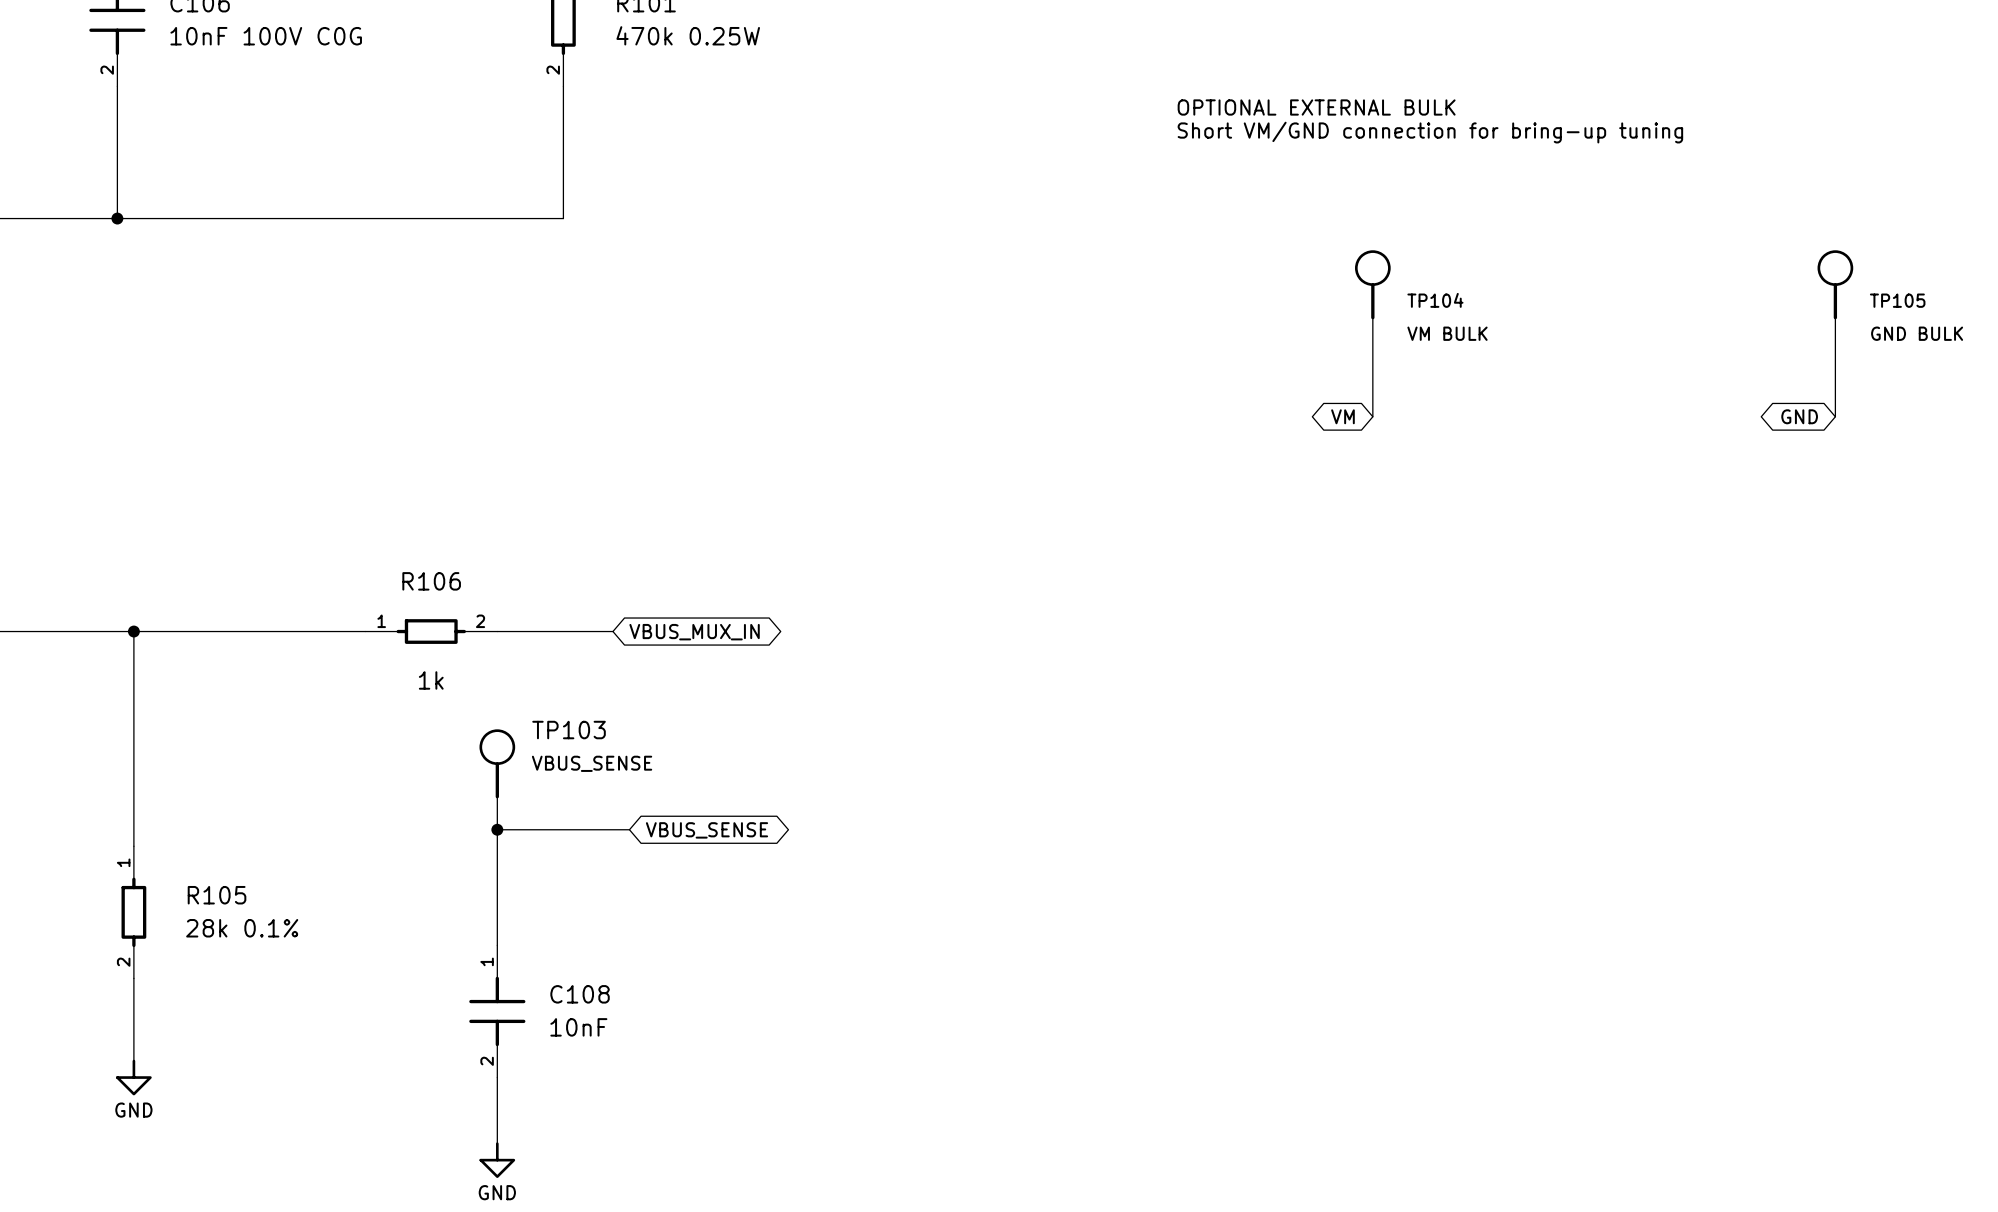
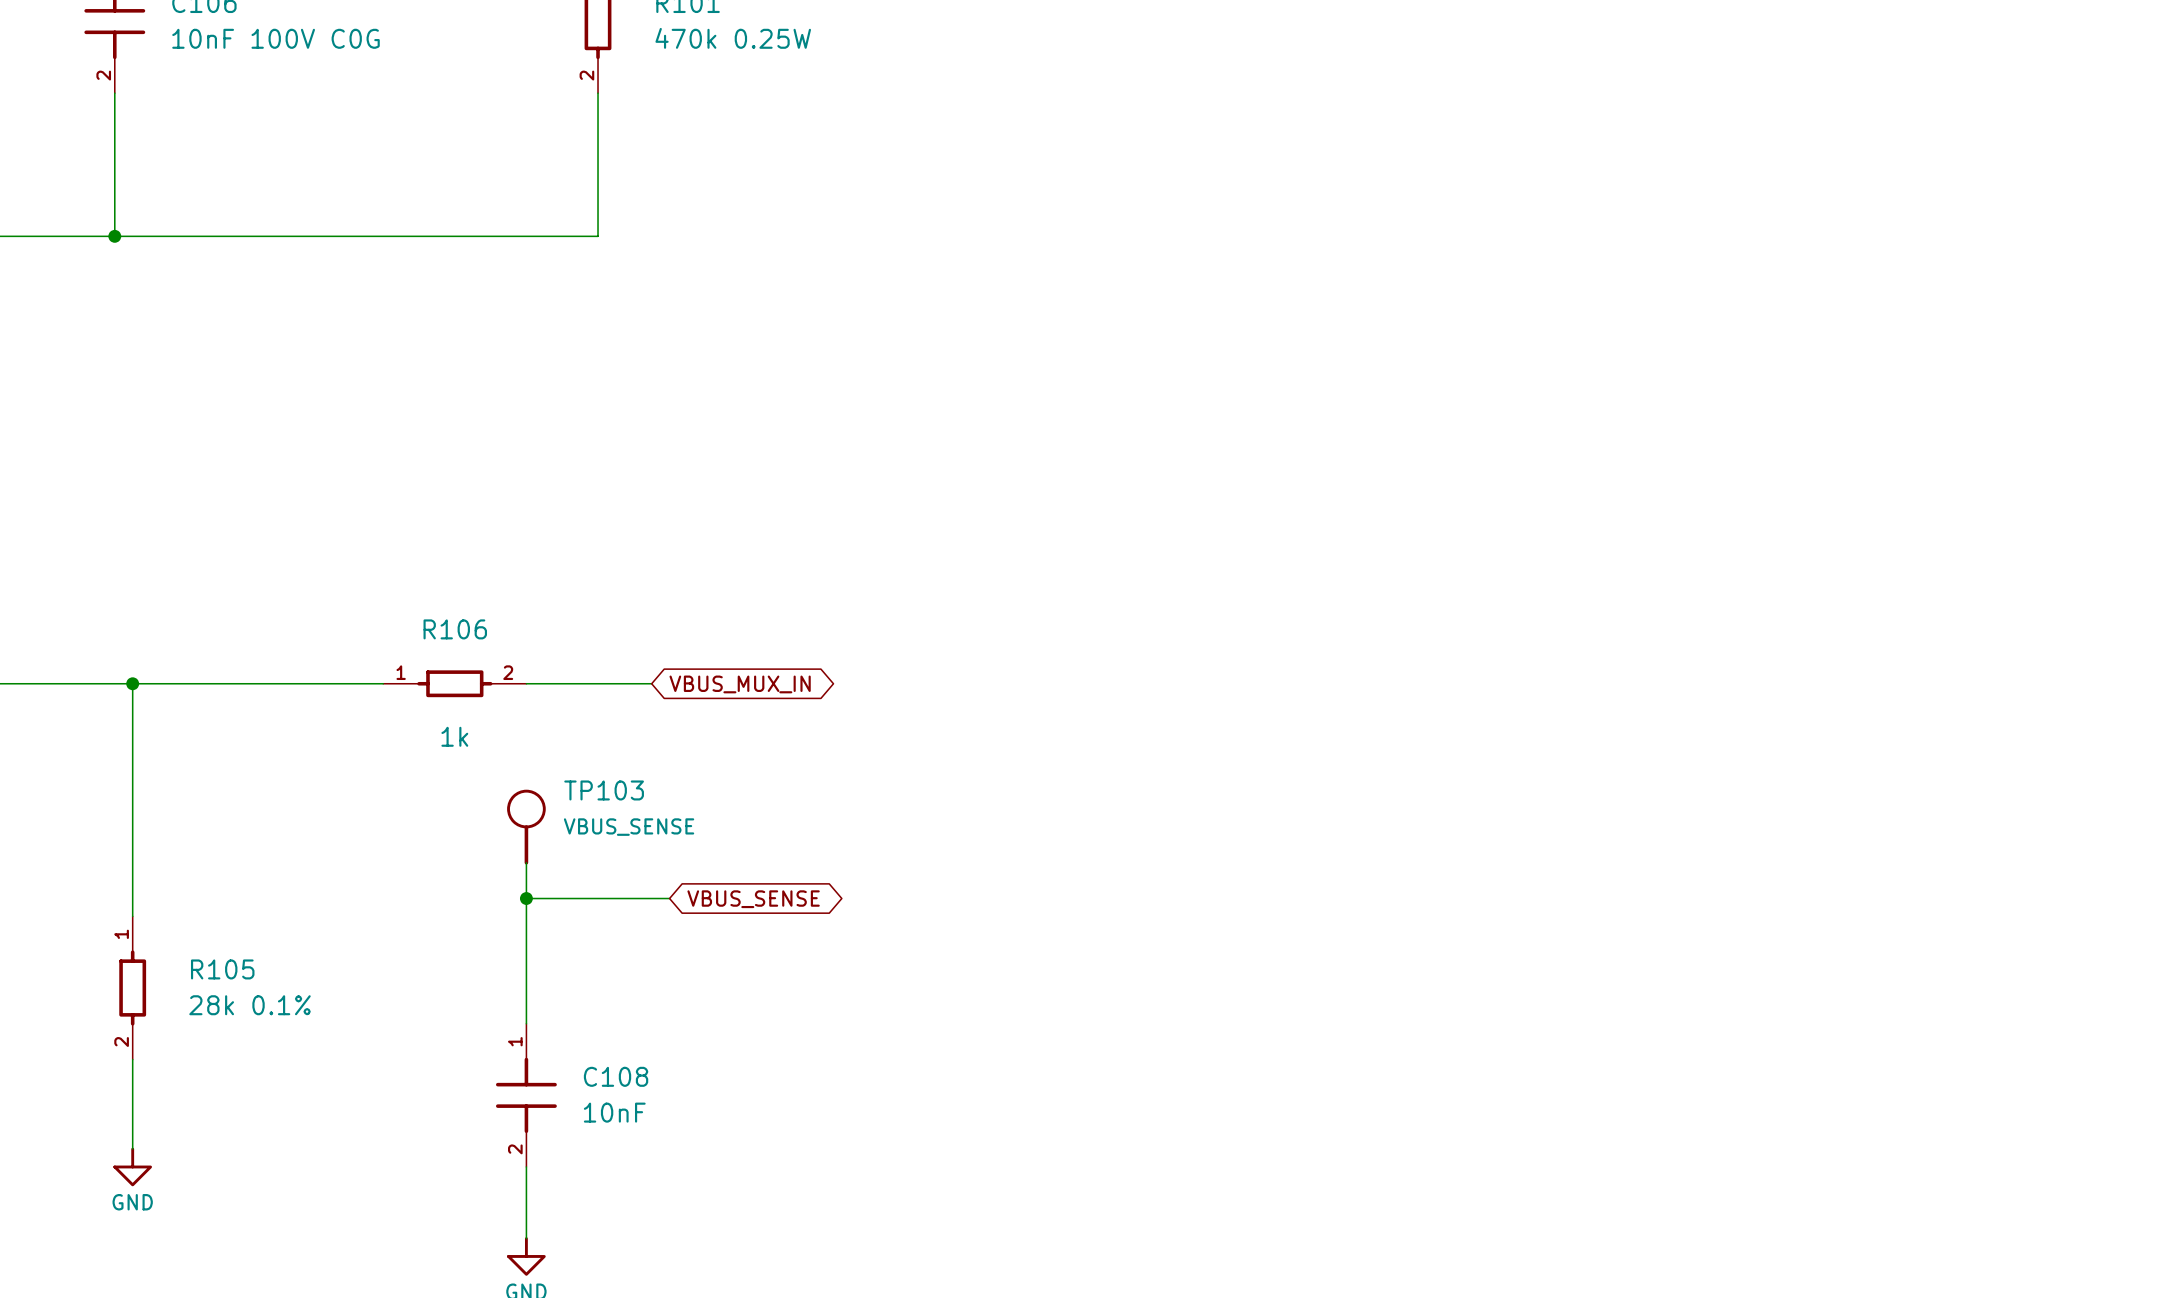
text: OPTIONAL EXTERNAL BULK (1316, 107) -> none
text: Short VM/GND connection for bring-up tuning (1430, 132) -> none
TP104: VM BULK (1372, 284) -> none
TP105: GND BULK (1835, 284) -> none
wire: (1372, 317) (1372, 416) -> none
wire: (1835, 317) (1835, 416) -> none
global label: VM (1342, 416) -> none
global label: GND (1799, 416) -> none

